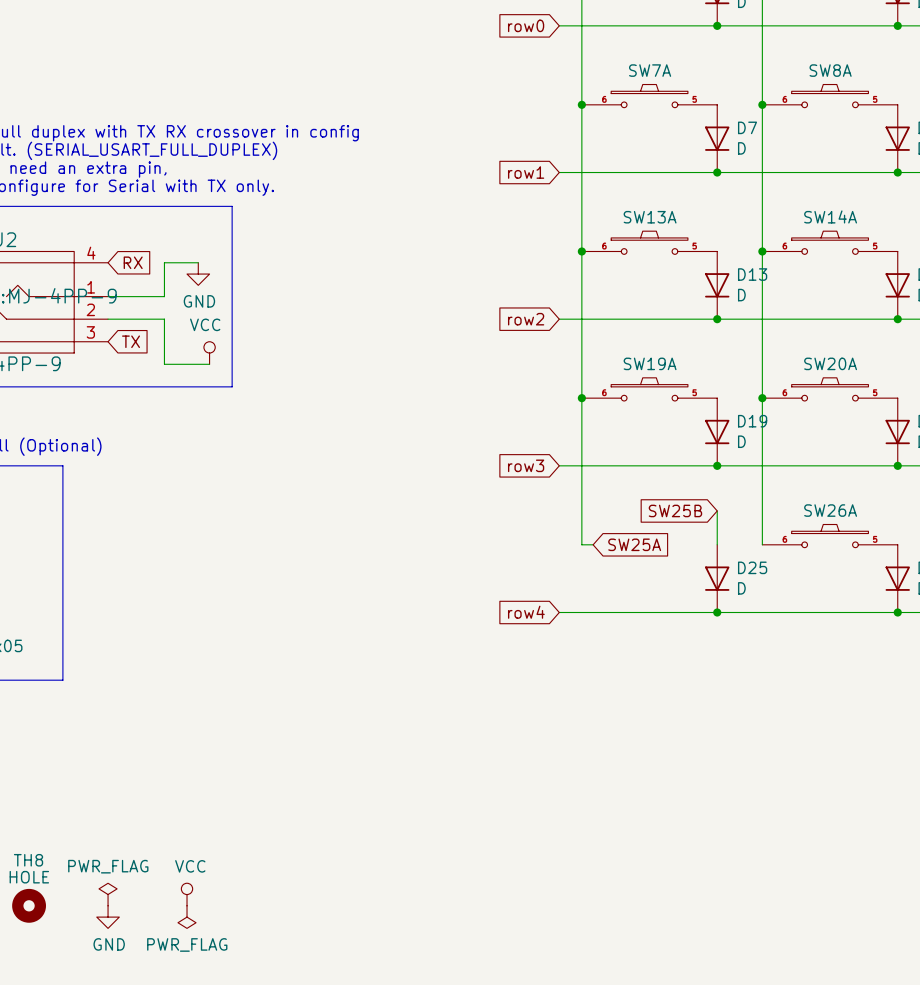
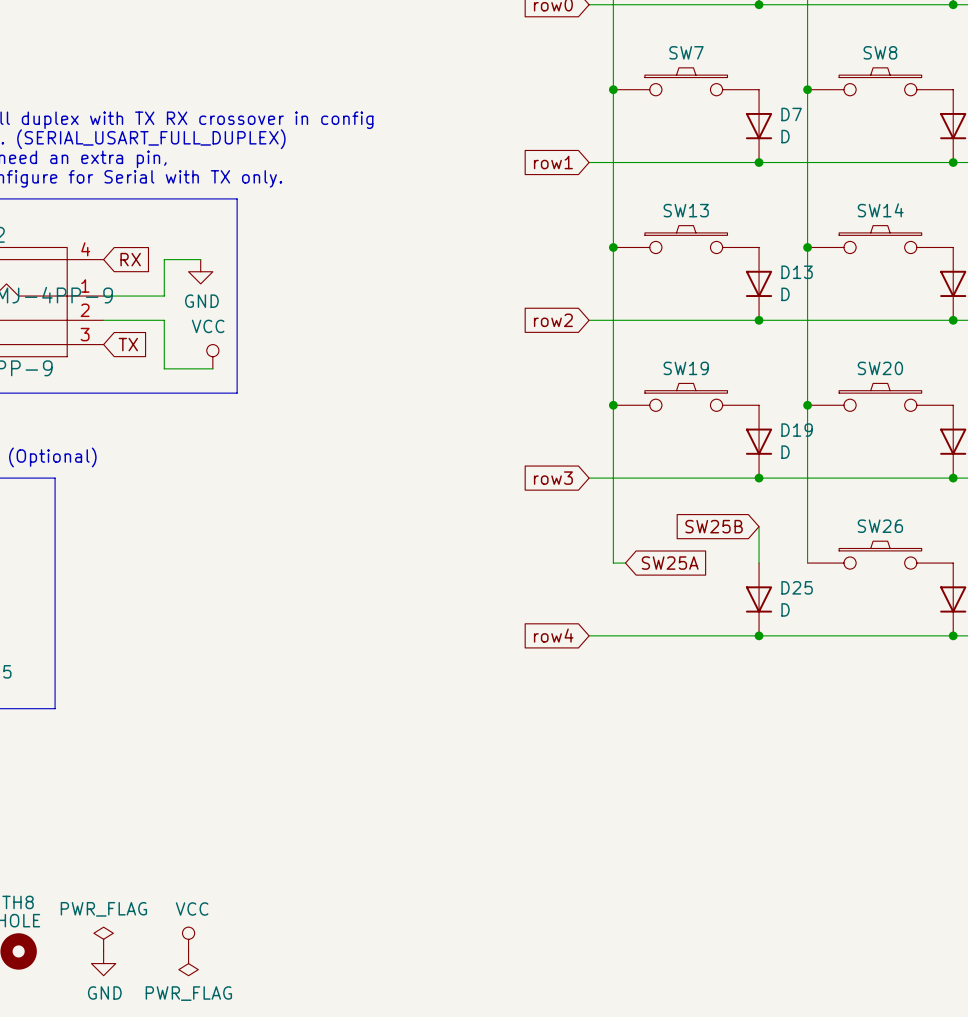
SW7A: (649, 96) -> none
SW8A: (830, 96) -> none
SW7: none -> (686, 81)
SW8: none -> (880, 81)
SW13A: (649, 242) -> none
SW14A: (830, 242) -> none
SW13: none -> (686, 239)
SW14: none -> (880, 239)
SW19A: (649, 389) -> none
SW20A: (830, 389) -> none
SW19: none -> (686, 397)
SW20: none -> (880, 397)
SW26A: (830, 536) -> none
SW26: none -> (880, 555)

